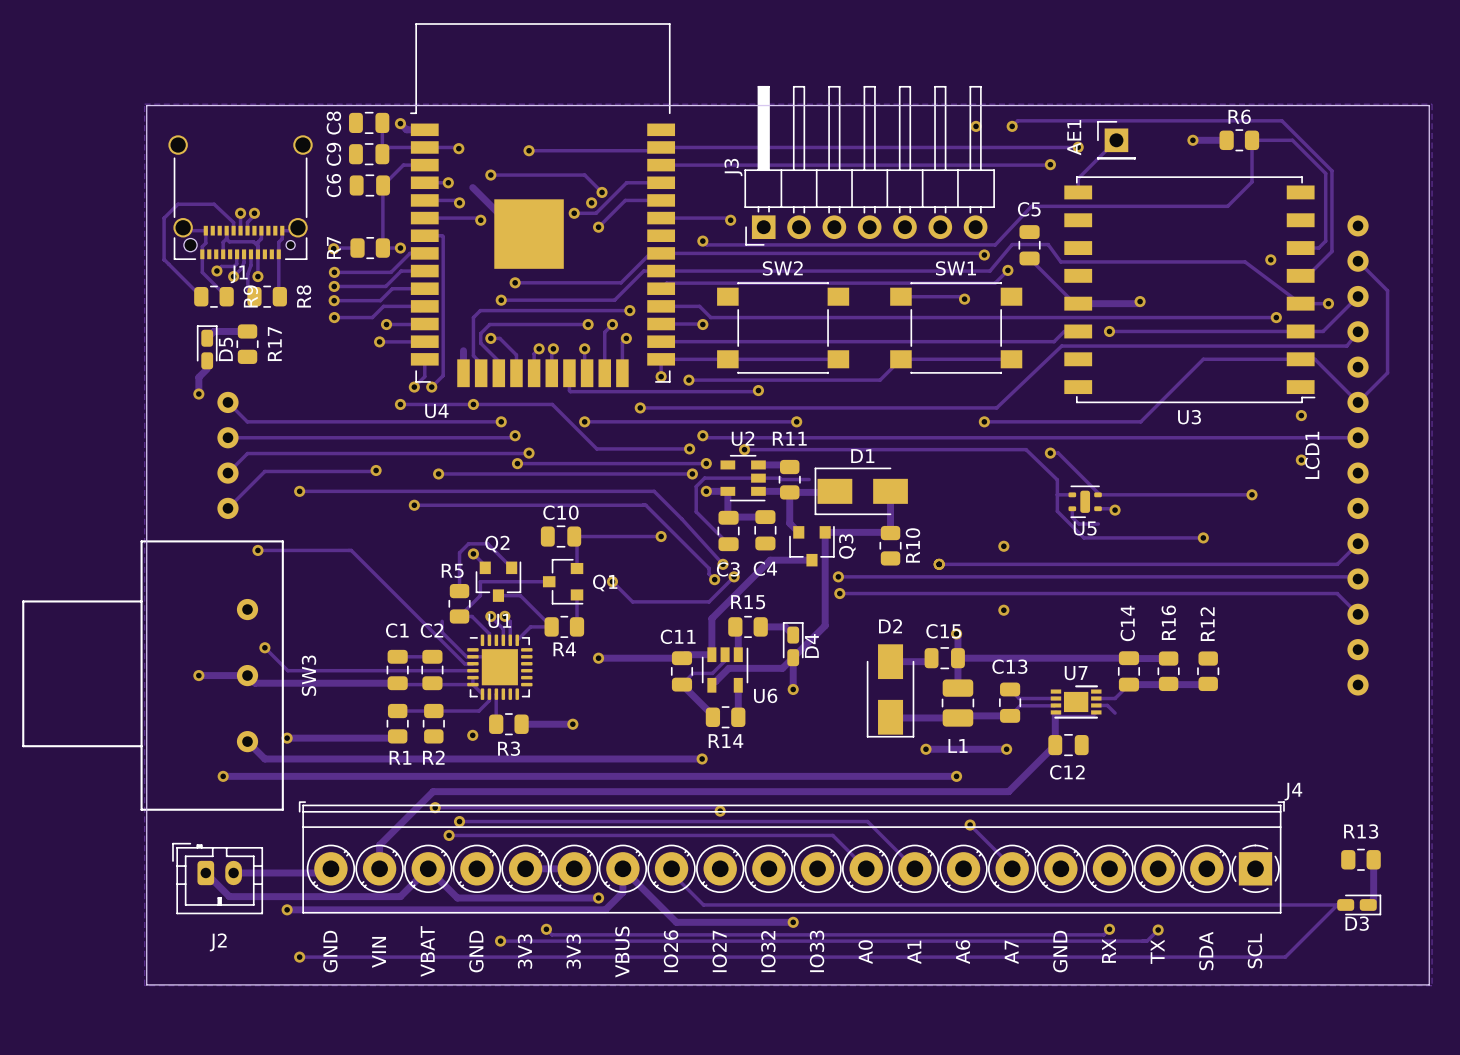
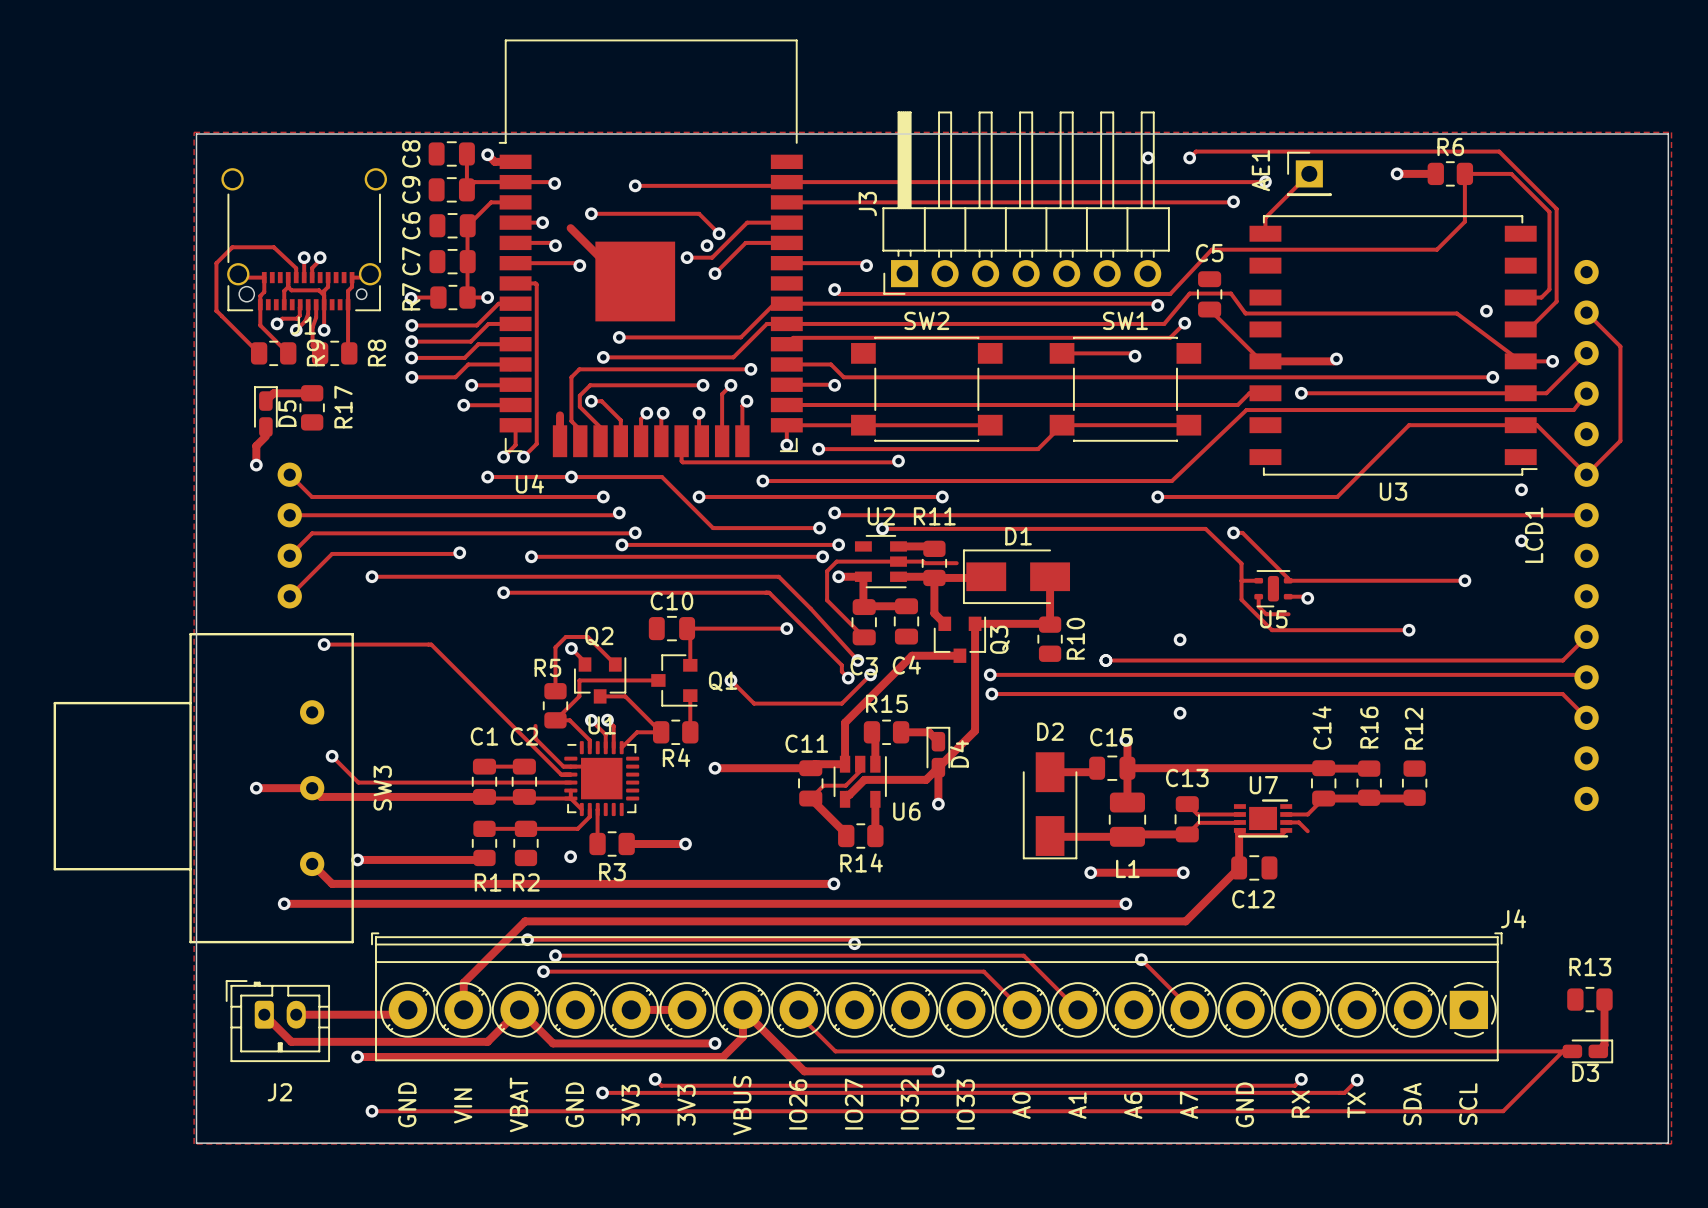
C7: none -> (452, 261)

